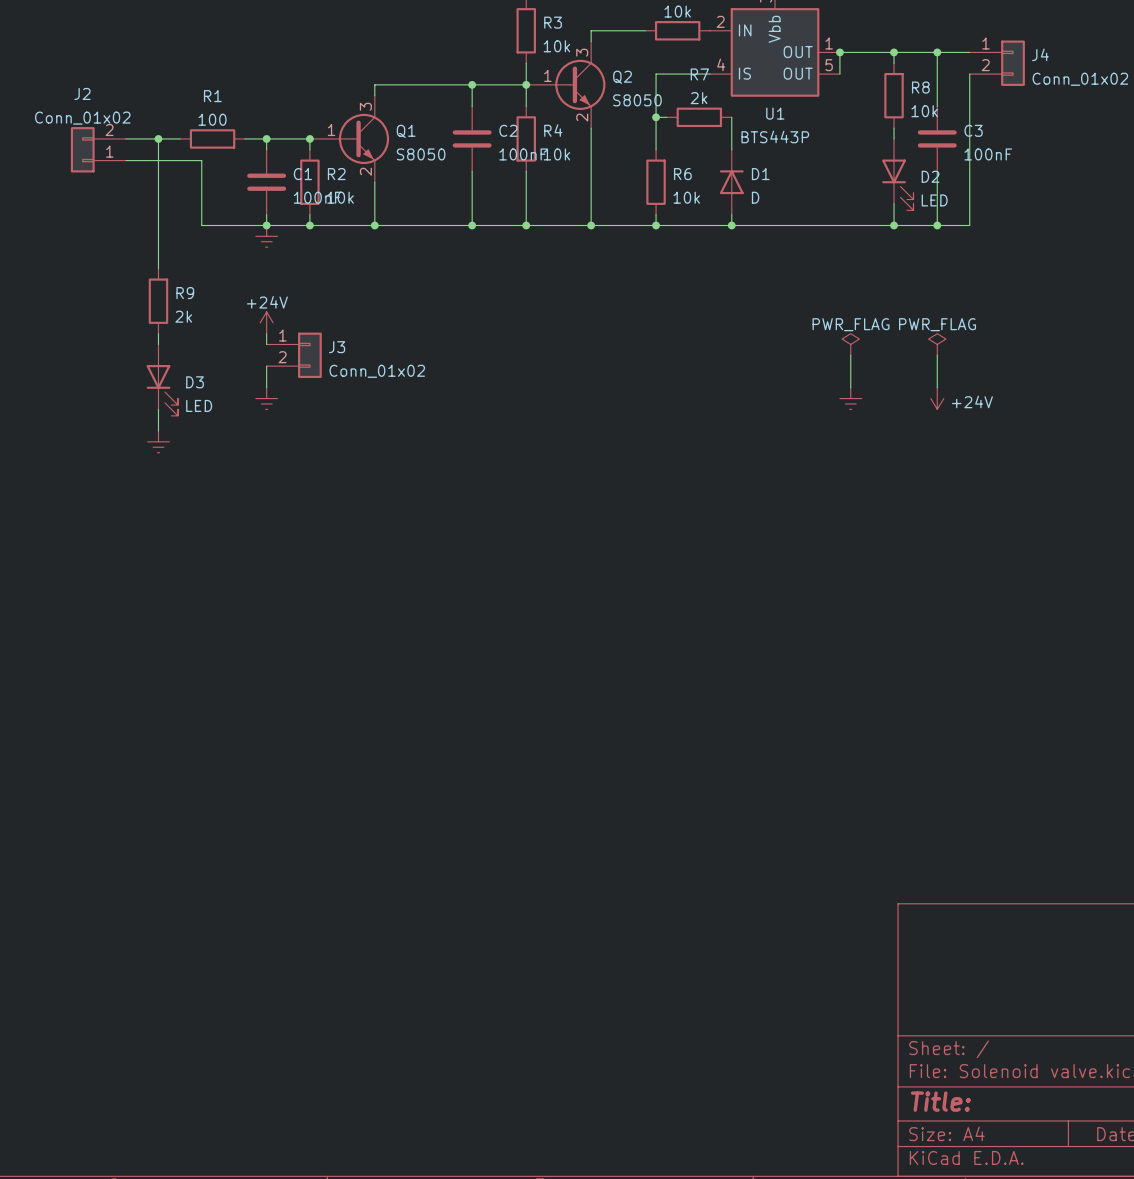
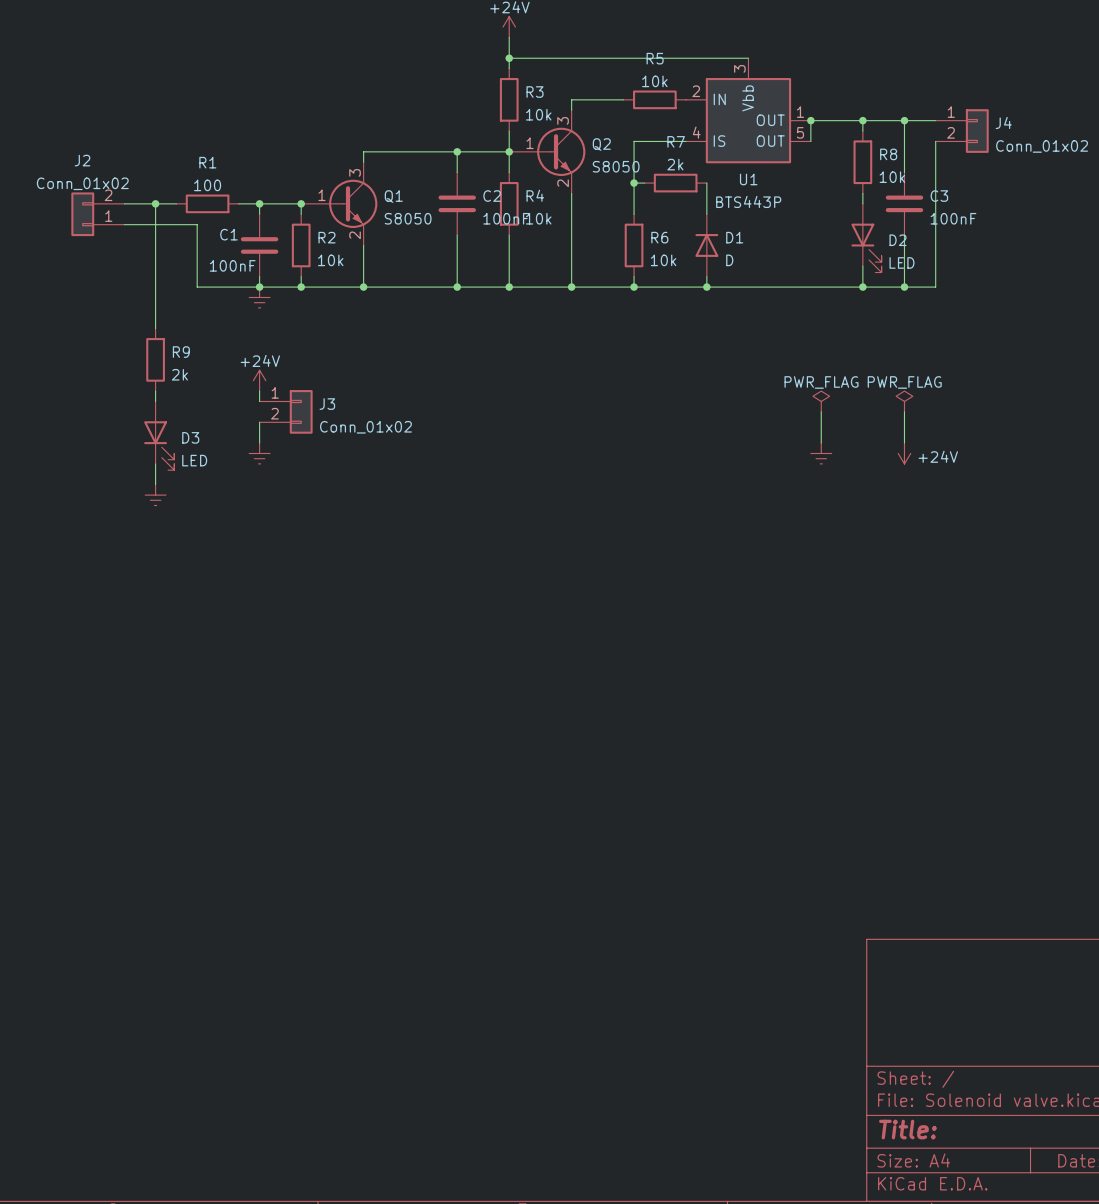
C1 name position: C1 (302, 174) -> C1 (228, 234)
C1 value position: 100nF (317, 197) -> 100nF (232, 265)

